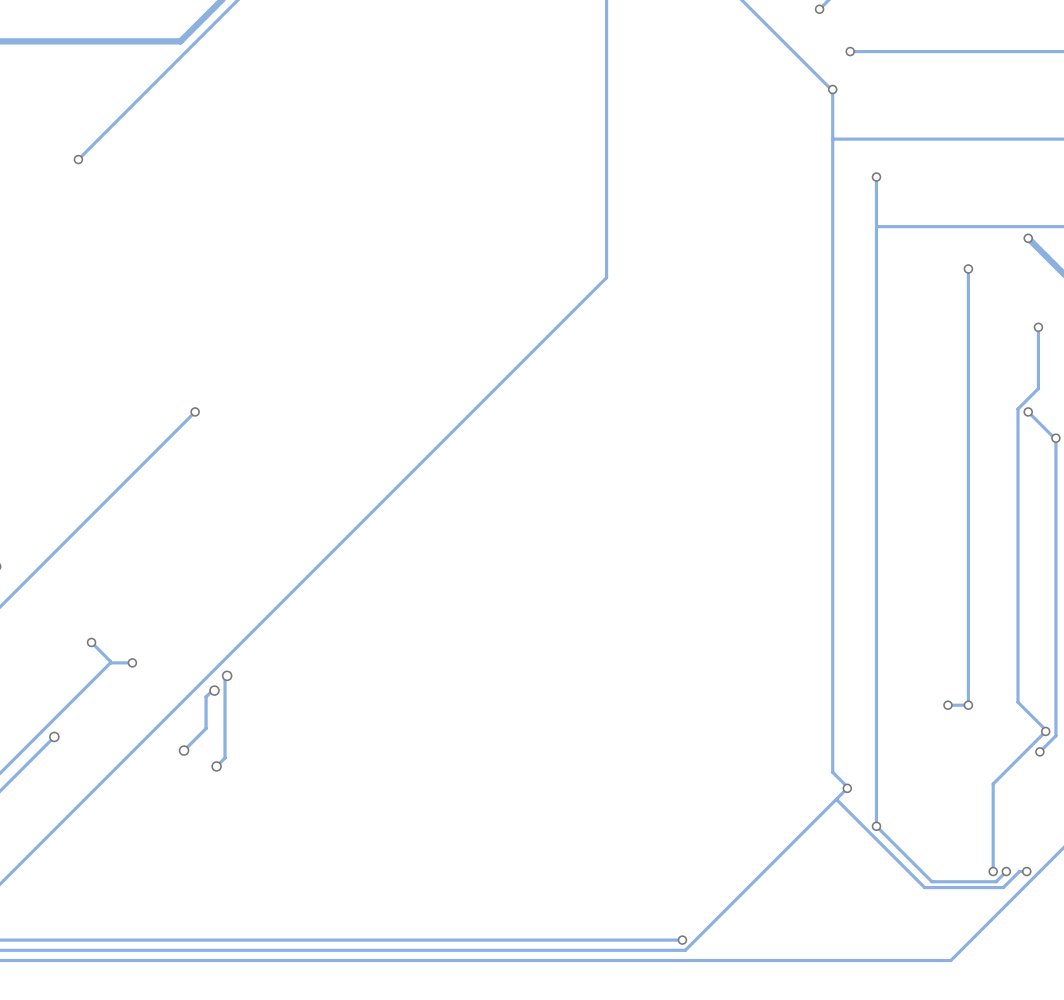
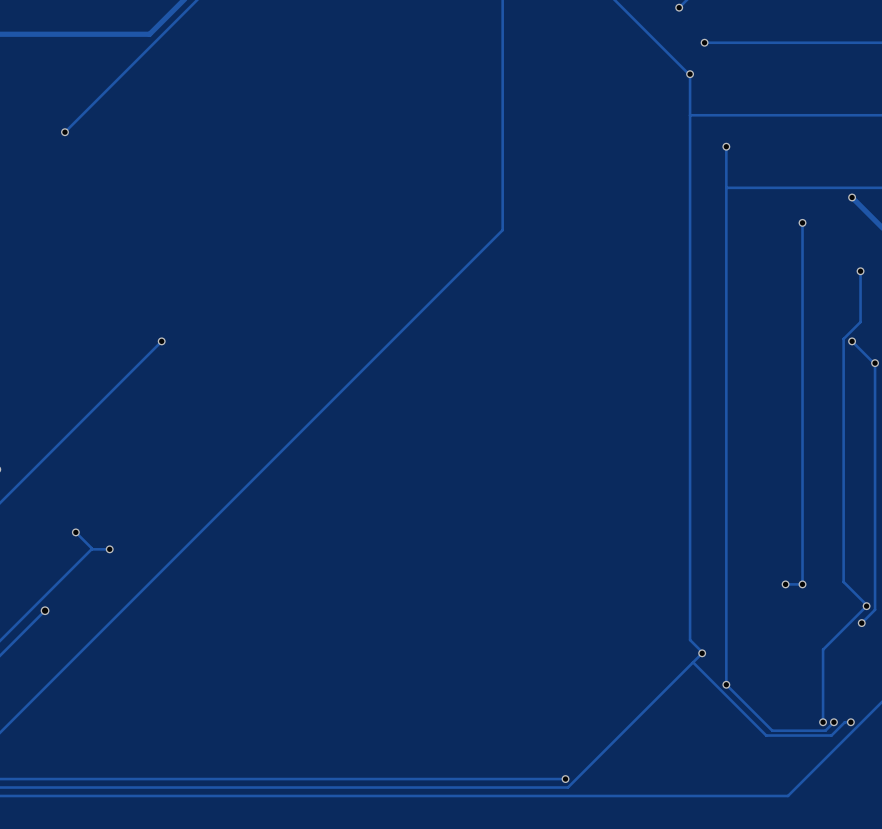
track: (227, 675) (225, 675) (225, 758) (216, 766) -> none
via: (227, 675) -> none
track: (214, 690) (206, 696) (206, 728) (184, 750) -> none
via: (214, 690) -> none
via: (184, 750) -> none
via: (216, 766) -> none

